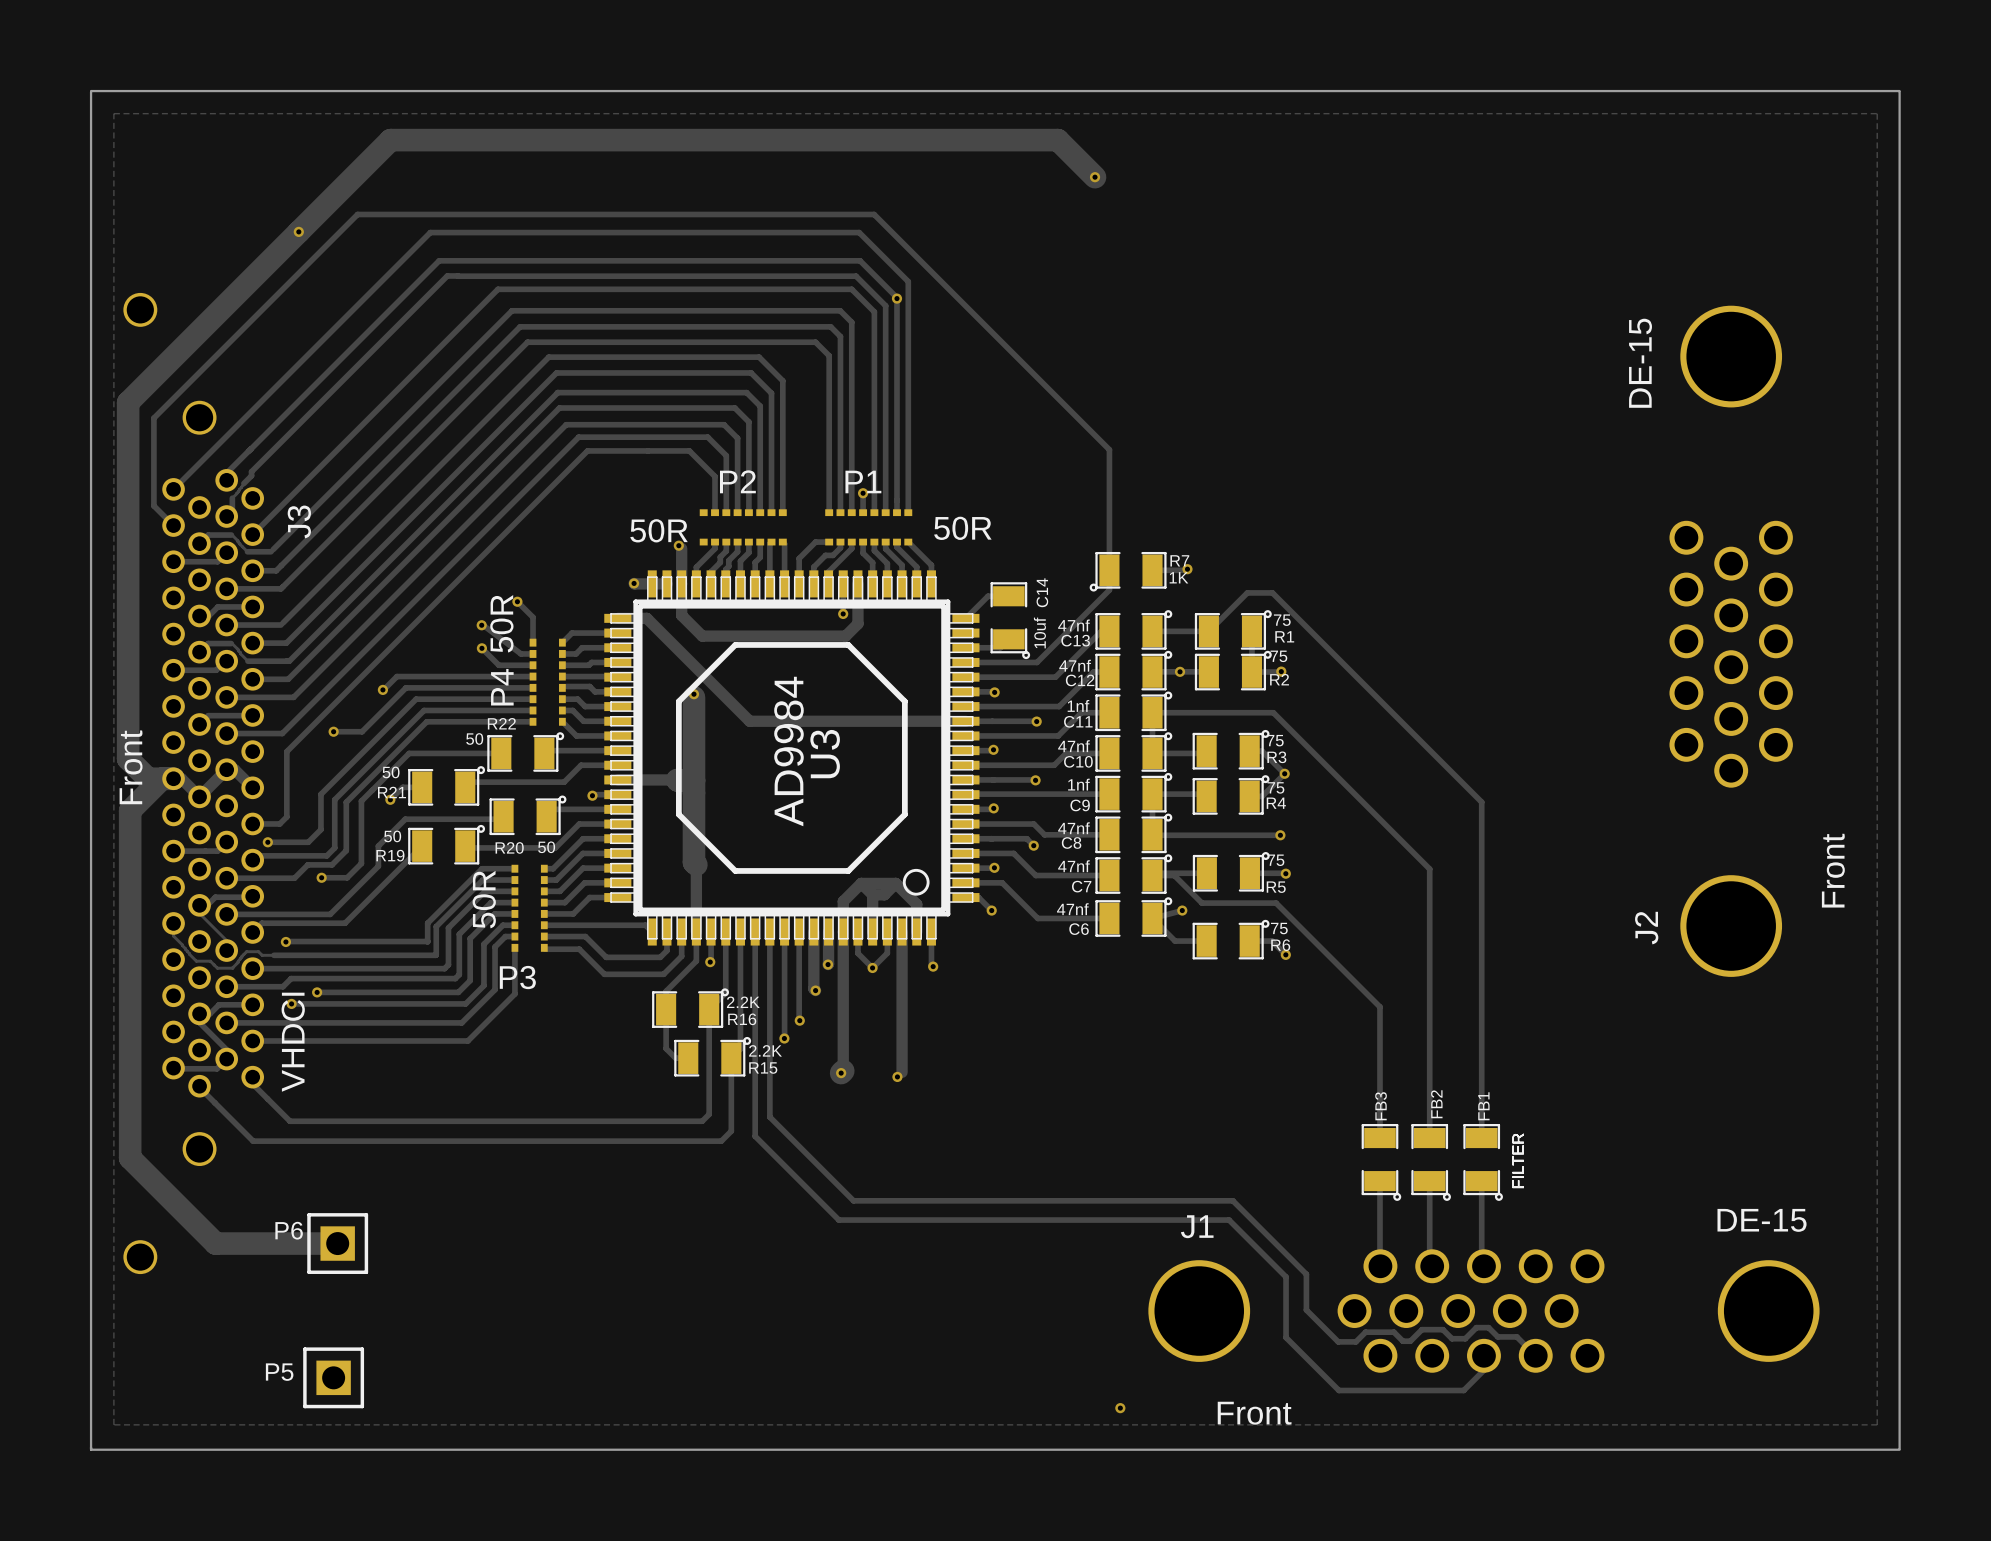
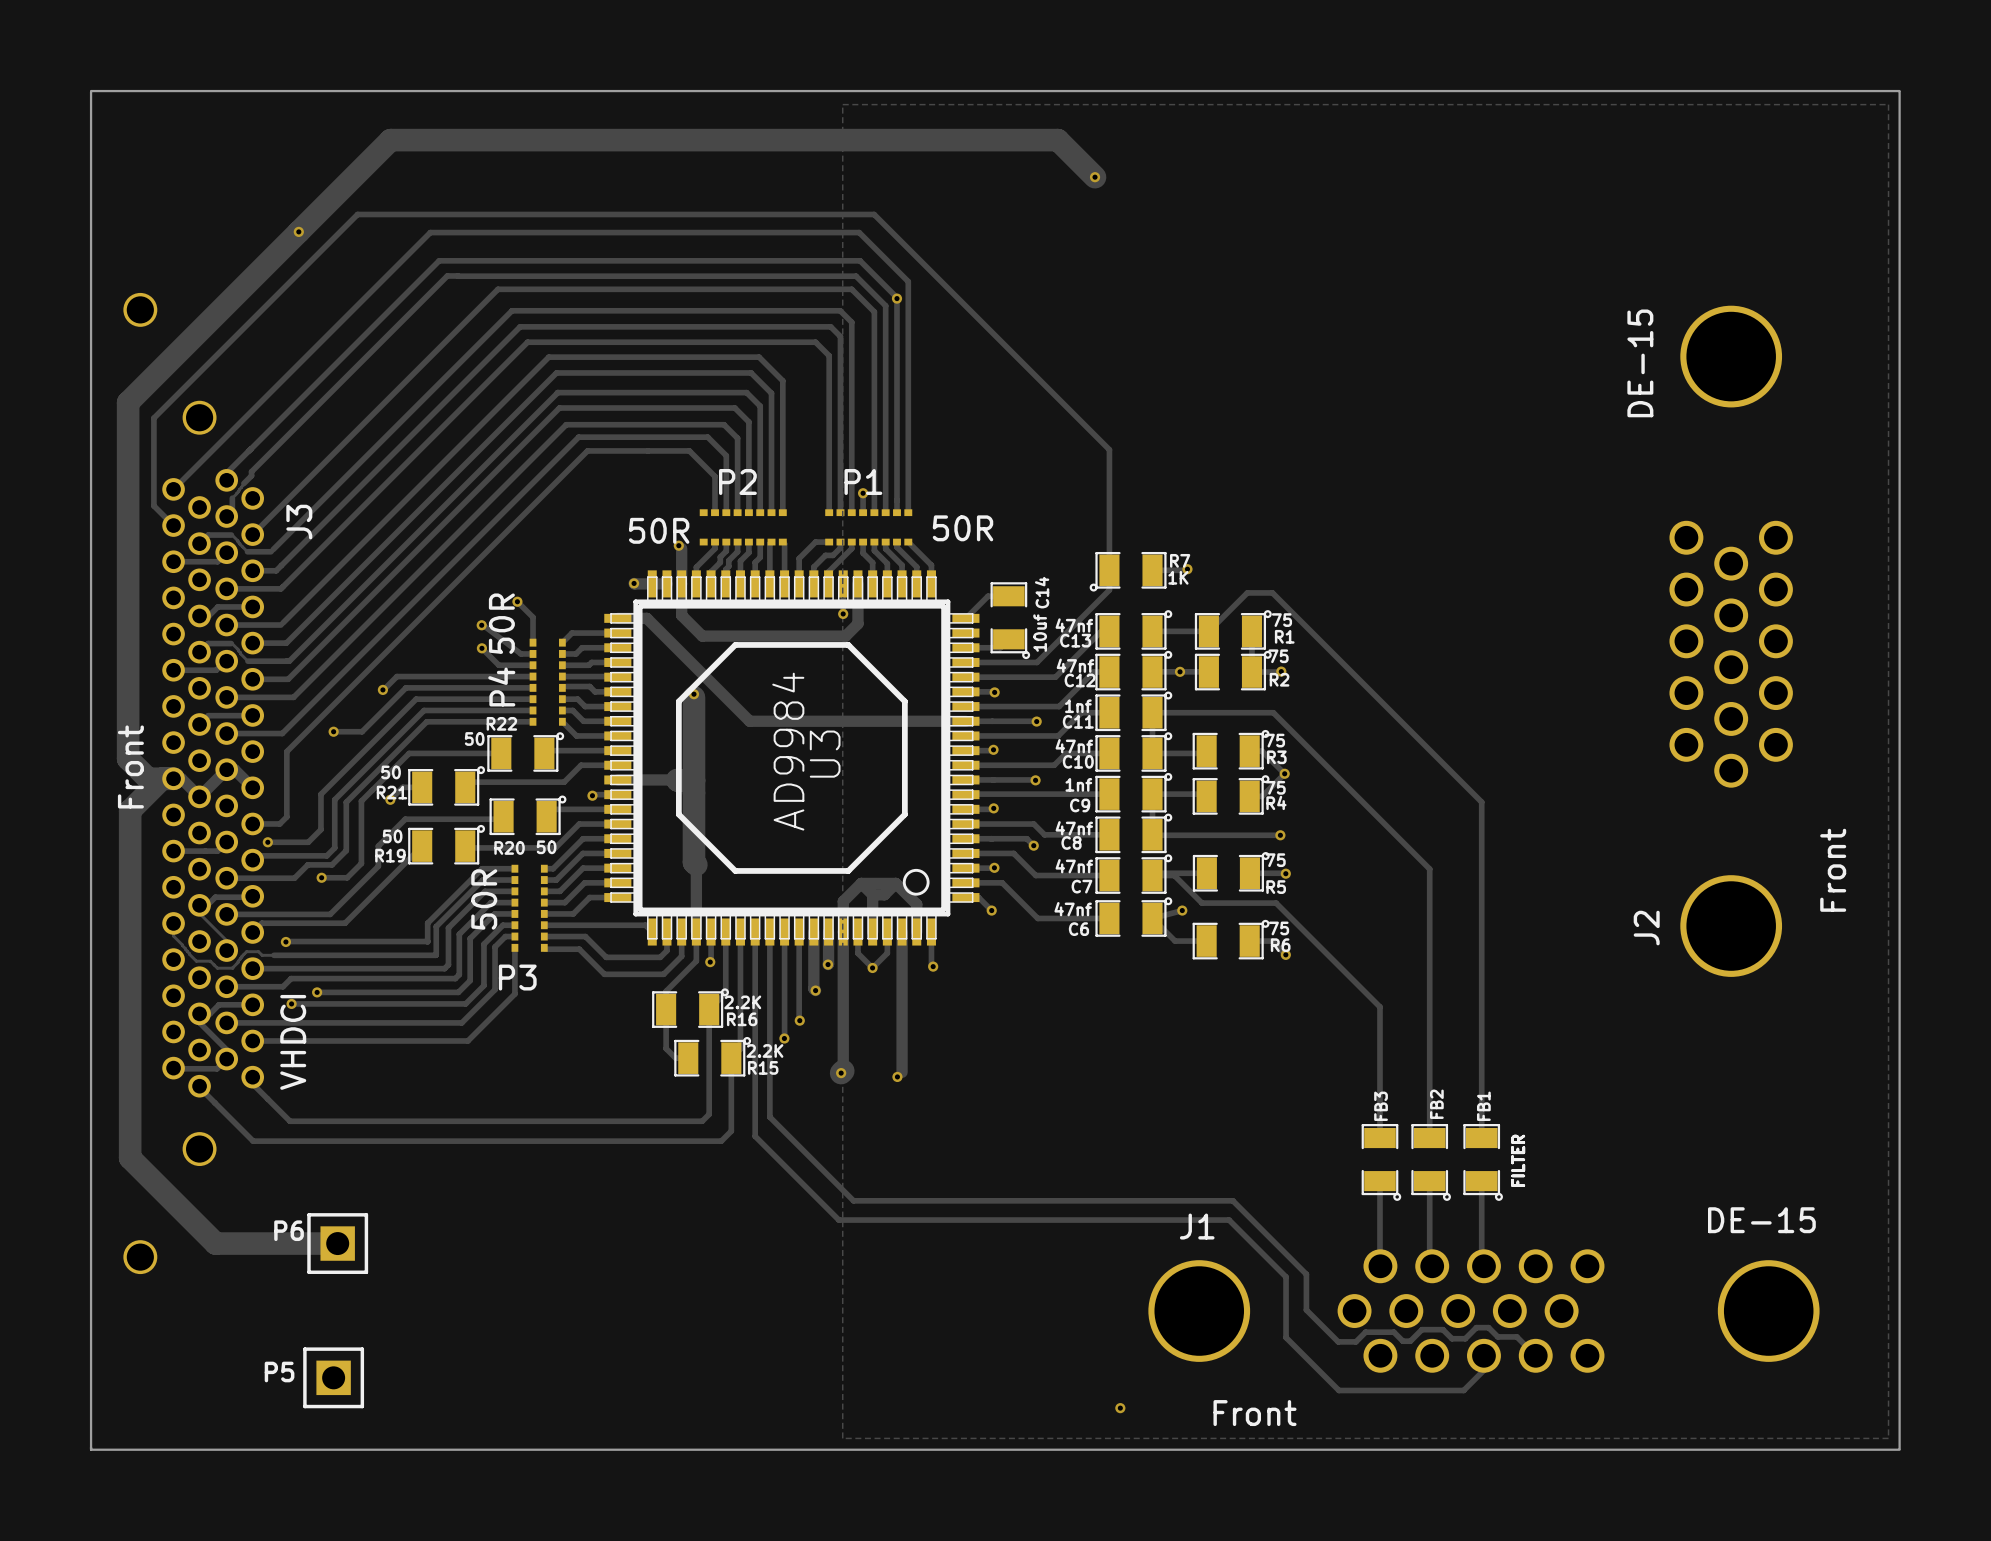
zone outline: (113, 113) (1877, 113) (1877, 1424) (113, 1424) (113, 113) -> (842, 104) (842, 1438) (1888, 1438) (1888, 104) (842, 104)

